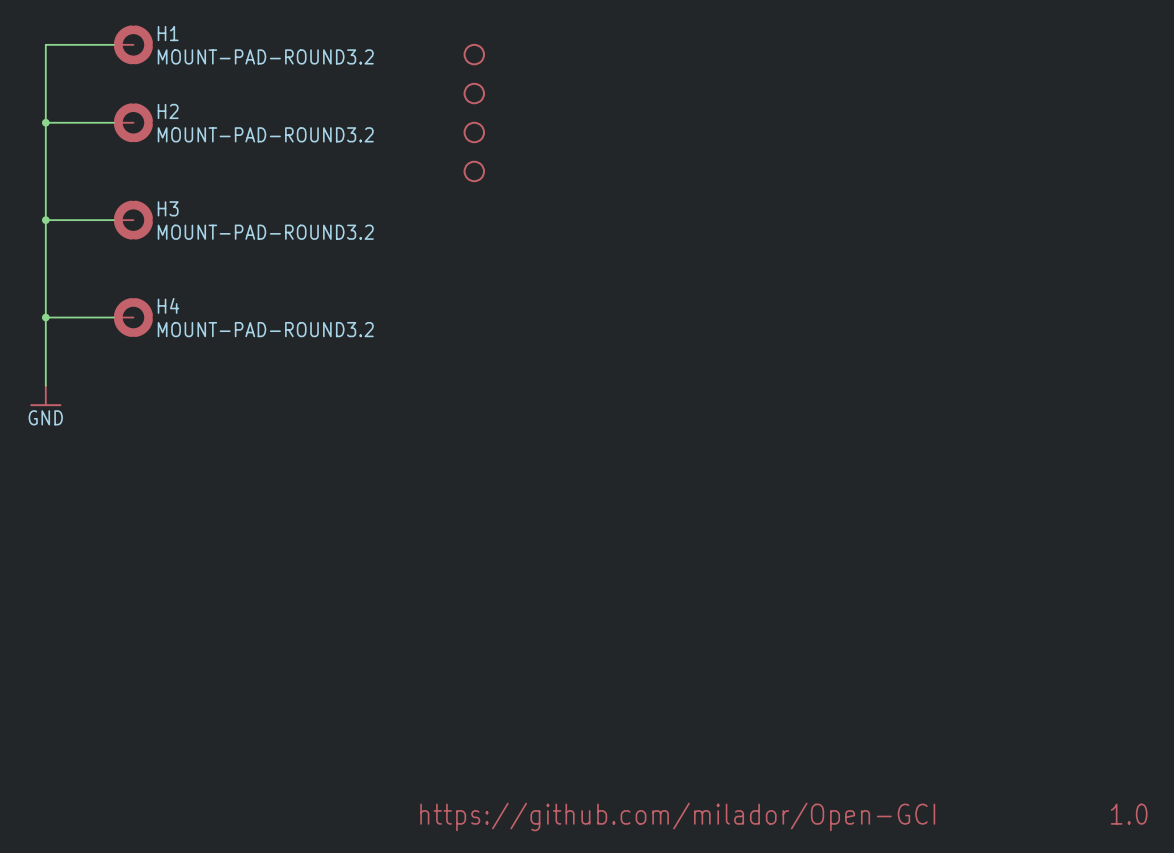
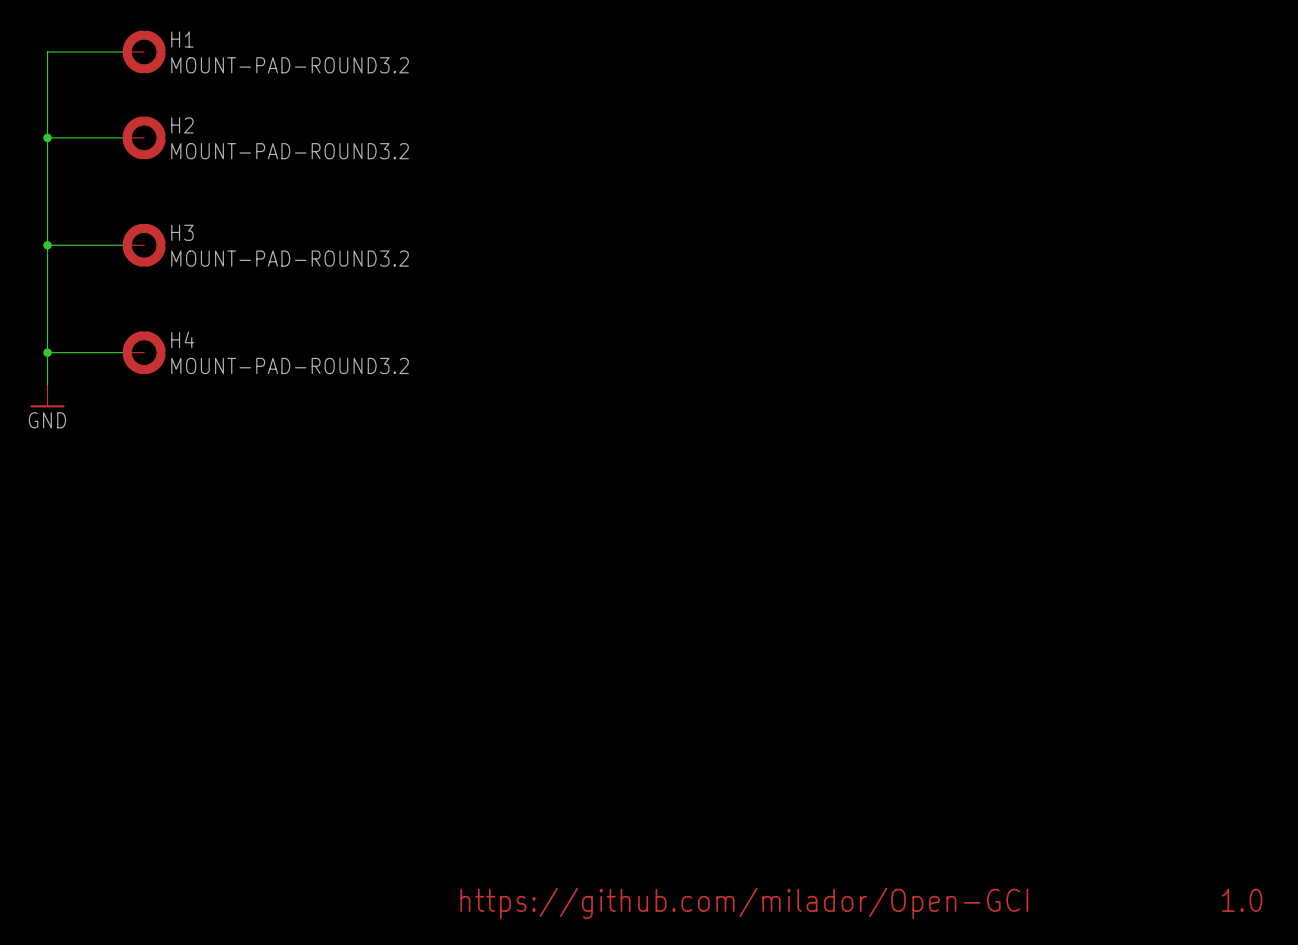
part: (474, 54) -> none
part: (474, 93) -> none
part: (474, 132) -> none
part: (474, 171) -> none
power symbol position: GND (45, 395) -> GND (47, 396)

